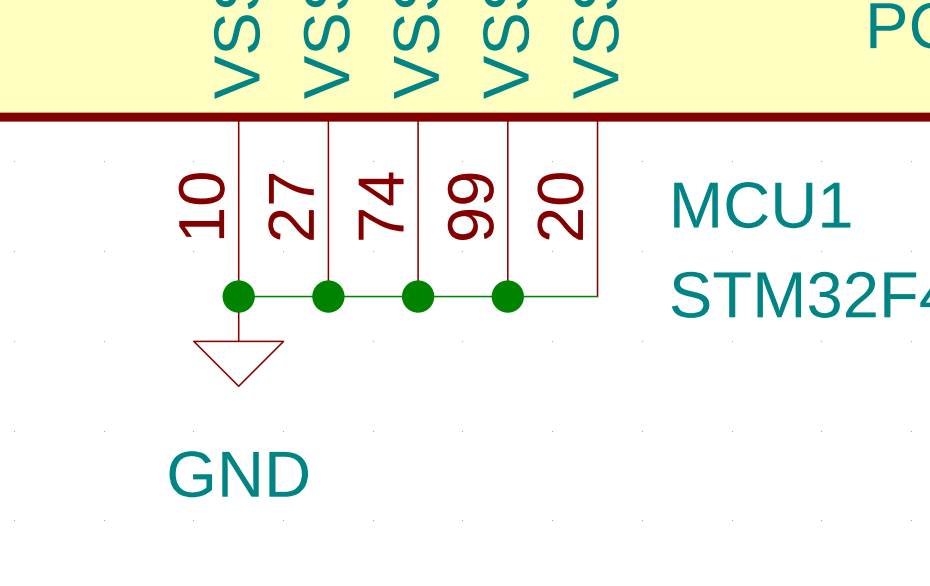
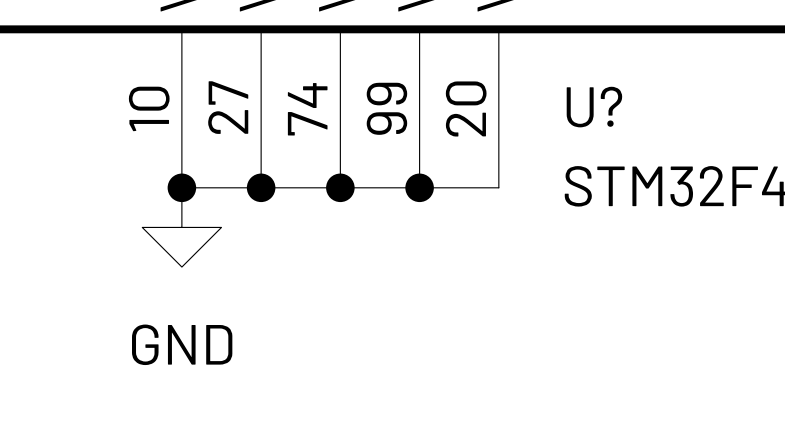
MCU1 name: MCU1 (762, 205) -> U? (594, 107)

